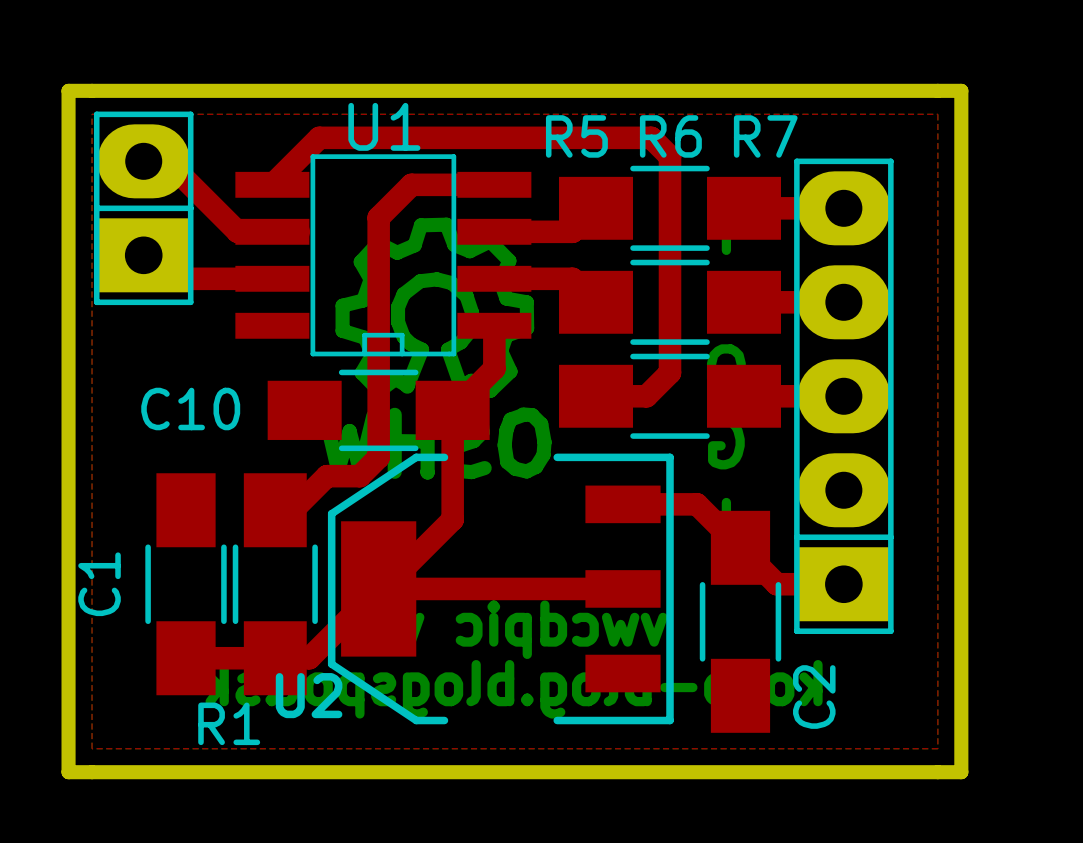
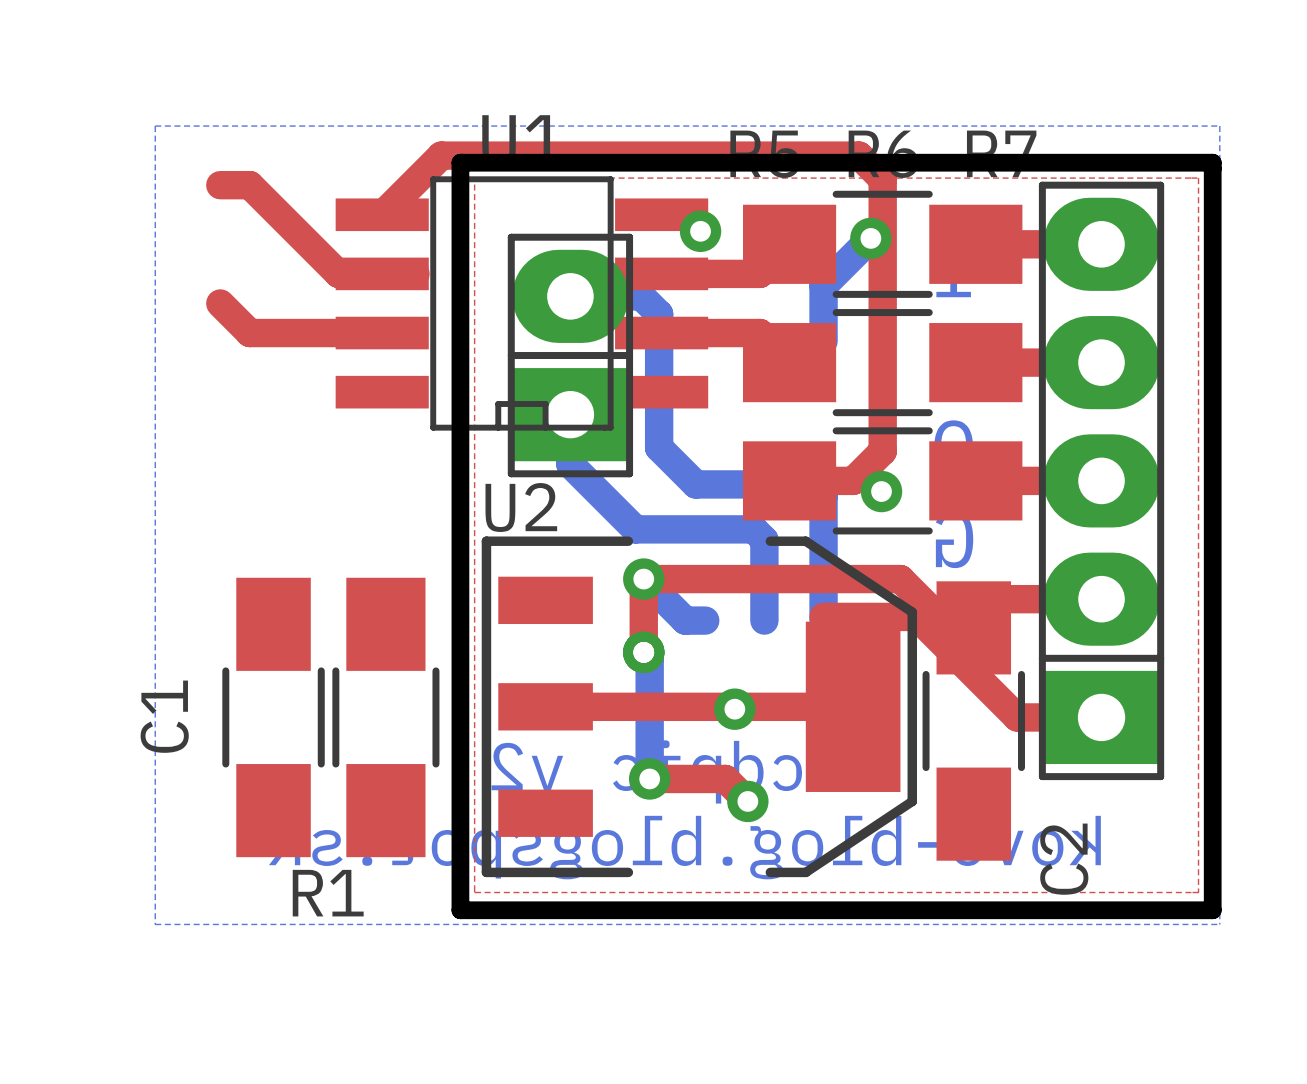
board edge: (68, 90) (961, 90) (961, 772) (68, 772) (68, 90) -> none
top zone outline: (92, 114) (92, 748) (937, 748) (937, 114) (92, 114) -> (474, 178) (474, 892) (1198, 892) (1198, 178) (474, 178)
top track: (496, 184) (411, 184) (378, 217) (378, 457) (359, 476) (326, 476) (292, 510) (275, 510) -> none
via: none -> (700, 231)
bottom track: none -> (870, 238) (823, 285) (823, 341)
via: none -> (870, 238)
part position: (143, 208) -> (570, 355)
drawing: [318, 217, 552, 480] -> none
bottom track: none -> (570, 296) (641, 296) (659, 314) (659, 447) (695, 484) (811, 484) (823, 496) (823, 620)
top track: (494, 325) (494, 368) (452, 410) (452, 519) (383, 588) -> none
bottom track: none -> (570, 414) (570, 464) (635, 529) (753, 529) (764, 540) (764, 620)
via: none -> (881, 491)
C10: (378, 410) -> none
bottom track: none -> (643, 579) (685, 620) (705, 620)
via: none -> (643, 579)
top track: none -> (1101, 599) (1002, 599) (973, 627) (949, 627) (900, 579) (643, 579) (643, 652)
bottom track: none -> (643, 652) (649, 658) (649, 778)
via: none -> (643, 652)
top track: none -> (545, 706) (853, 706)
via: none -> (734, 709)
U2 rotation: 0° (500, 588) -> 180° (699, 706)
top track: (623, 588) (378, 588) (309, 658) (186, 658) -> none
C2 position: (740, 621) -> (973, 721)
top track: none -> (649, 778) (725, 778) (747, 801)
via: none -> (649, 778)
via: none -> (747, 801)
U2 name position: U2 (309, 695) -> U2 (521, 507)
board edge: none -> (463, 910) (460, 910) (460, 162) (1212, 162) (1212, 910) (465, 910)

